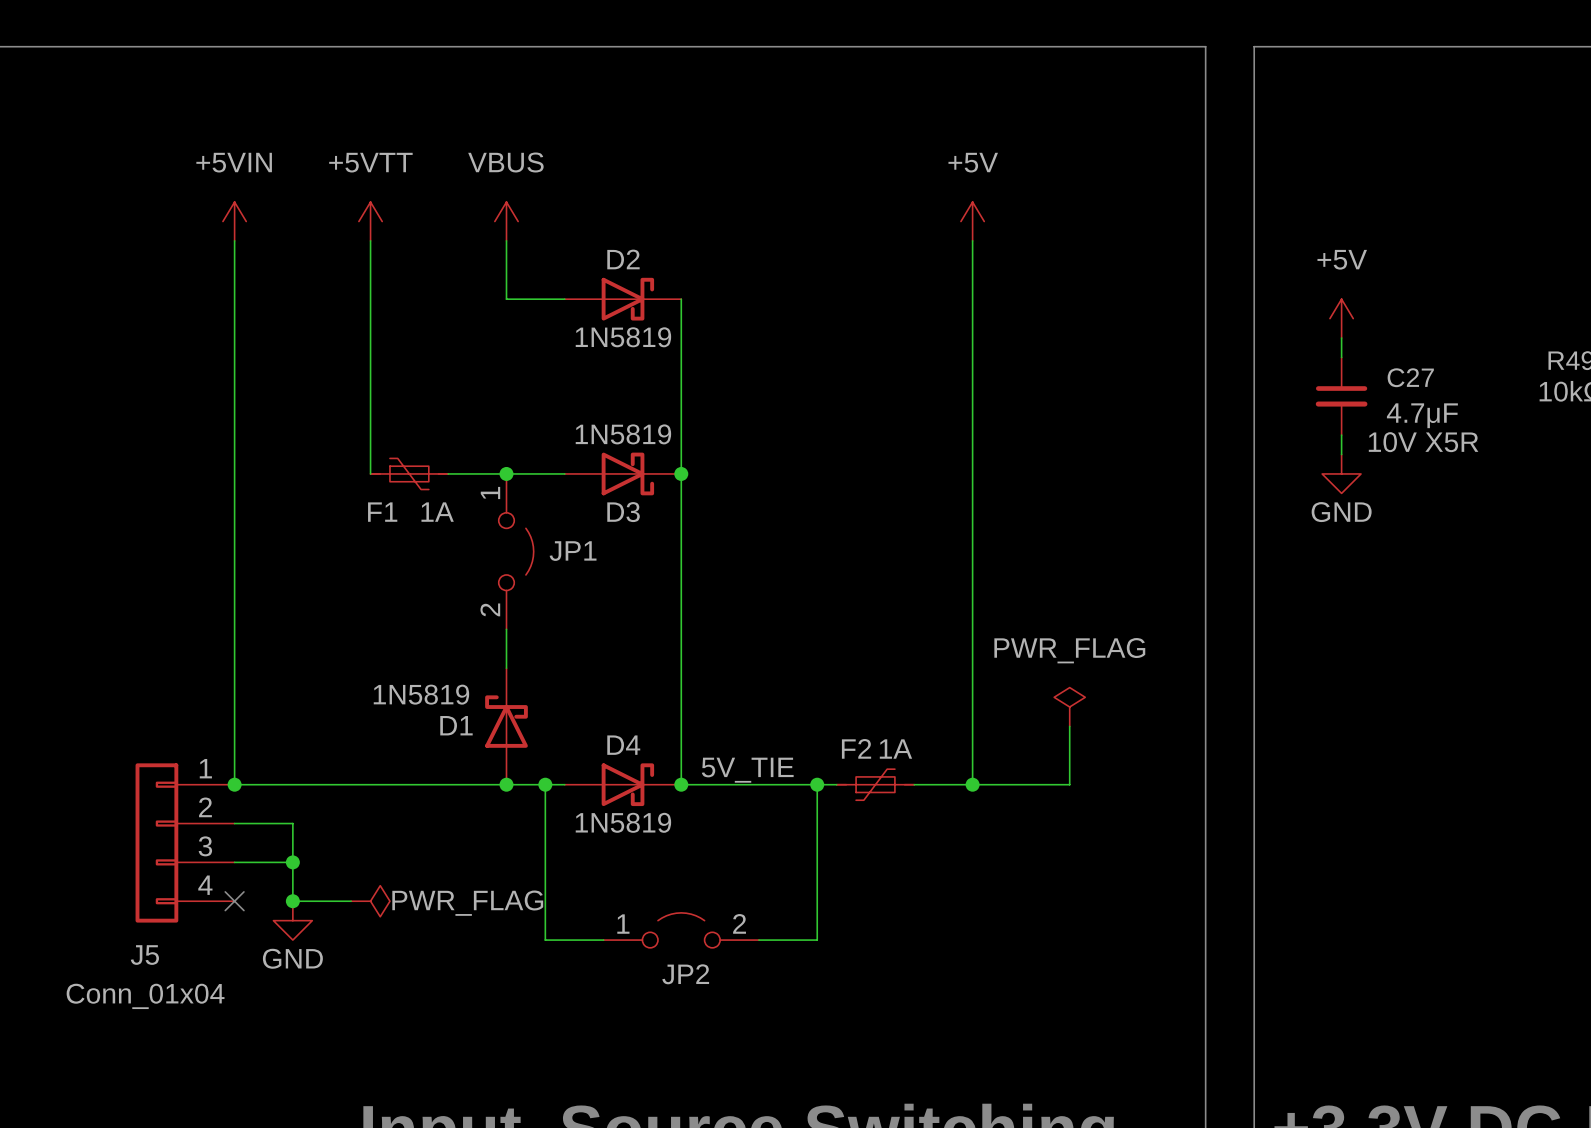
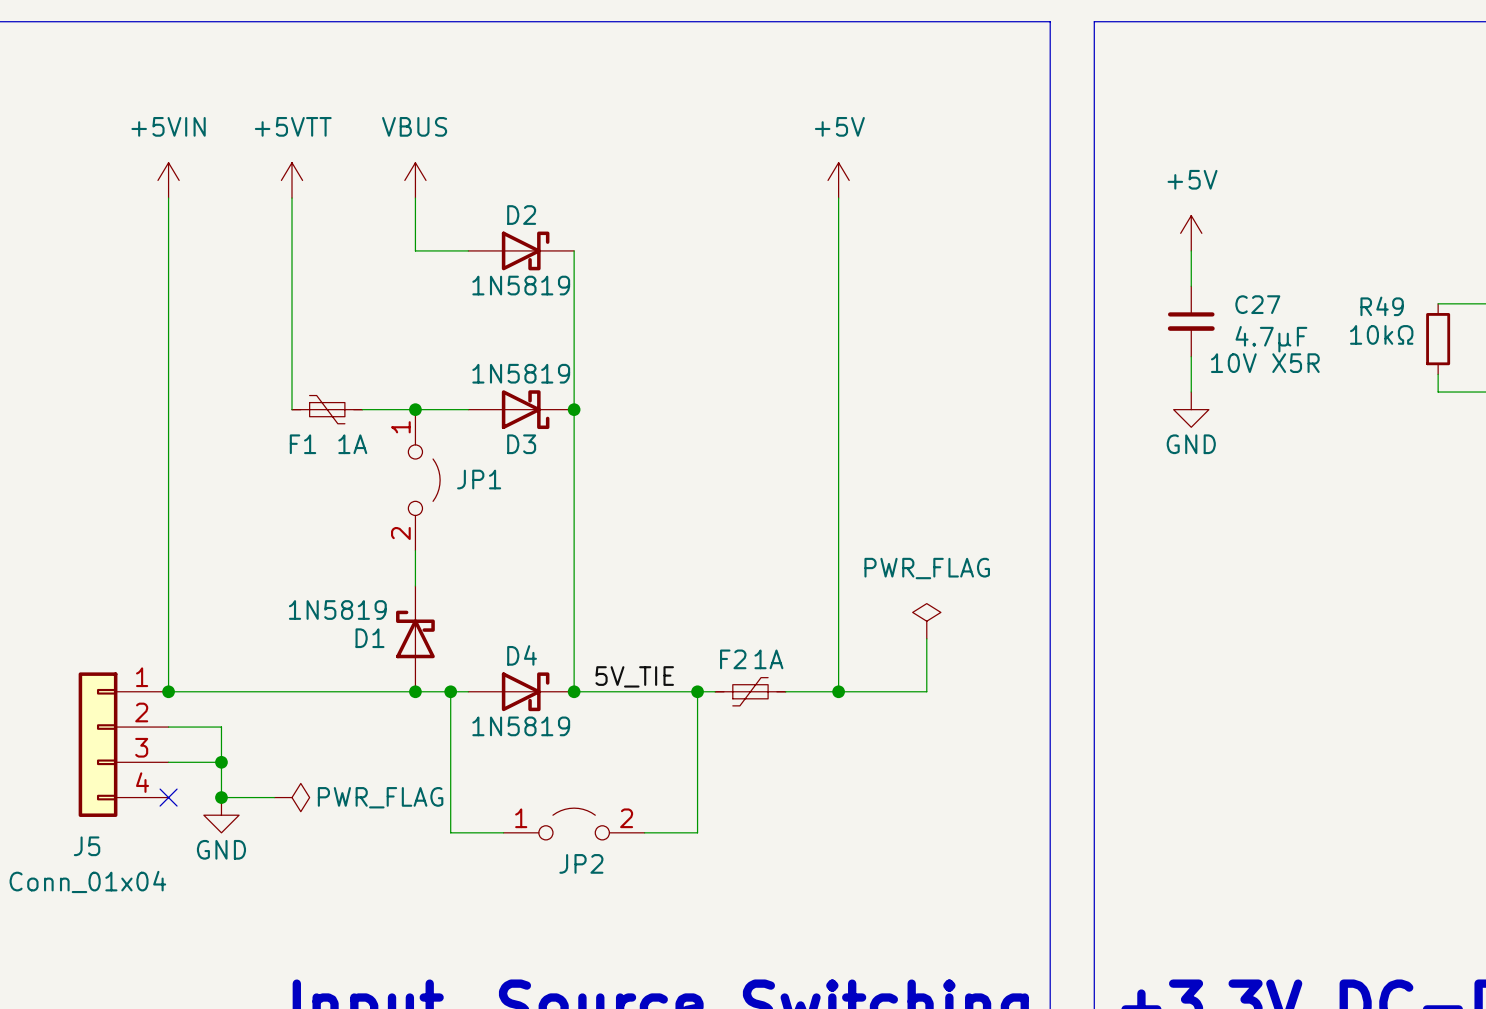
wire: none -> (1191, 250) (1191, 286)
power symbol position: +5V (1341, 318) -> +5V (1191, 233)
wire: (1341, 338) (1341, 357) -> none
C27 position: (1341, 396) -> (1191, 321)
wire: none -> (1191, 356) (1191, 392)
wire: (1341, 435) (1341, 454) -> none
power symbol position: GND (1341, 473) -> GND (1191, 409)

